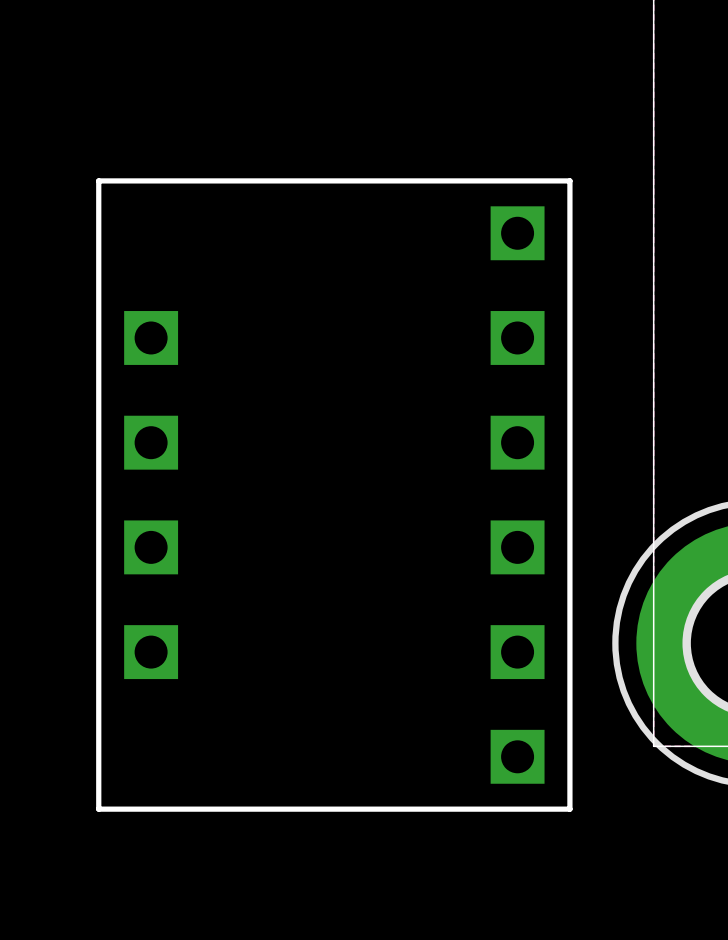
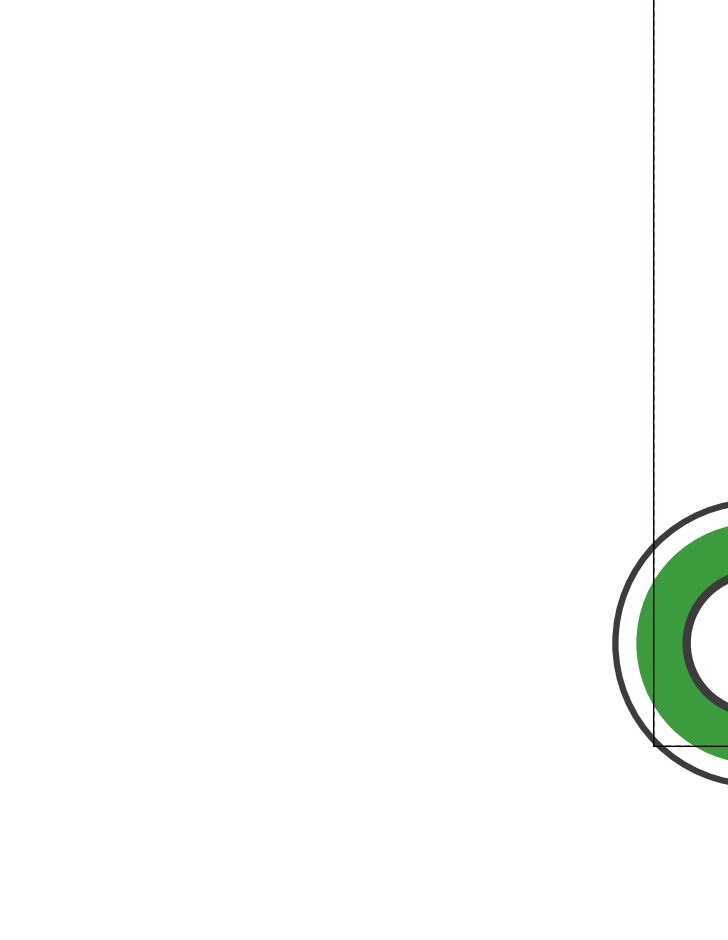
part: (334, 495) -> none

